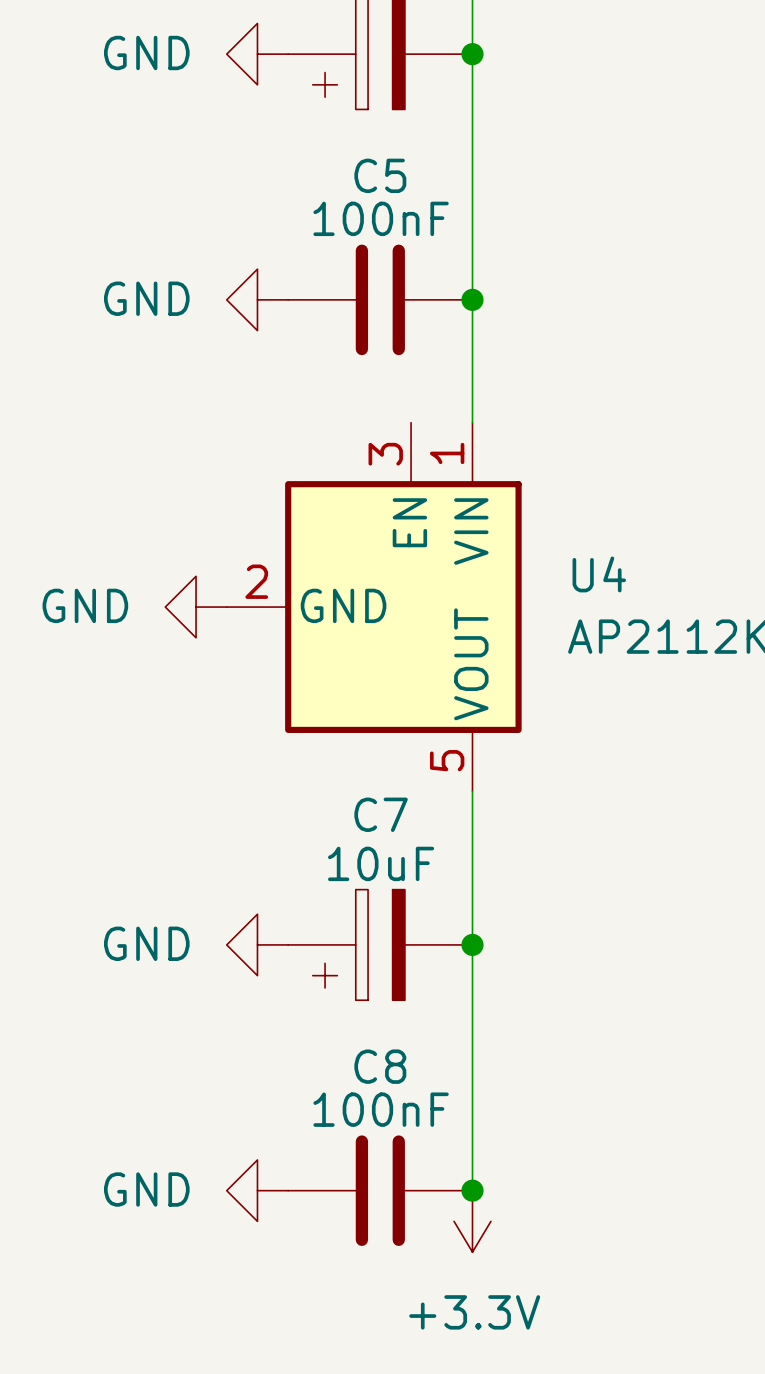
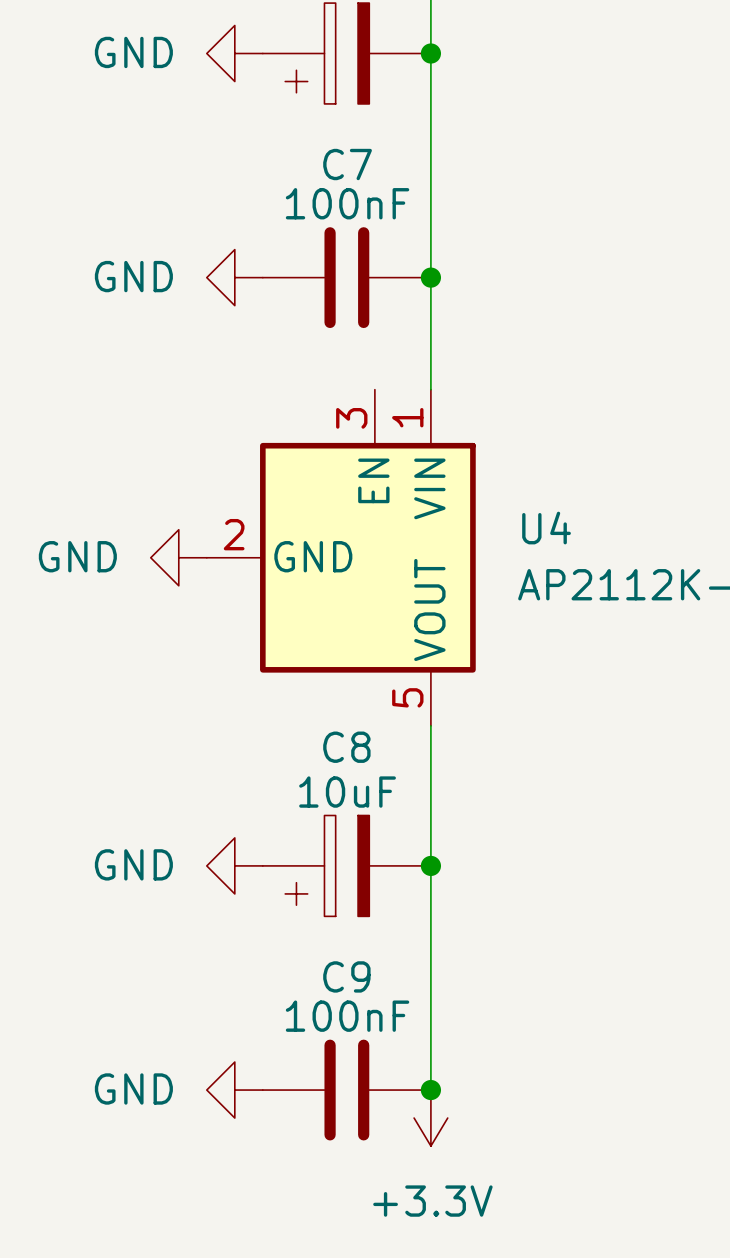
C5 name: C5 (380, 175) -> C7 (347, 164)
C7 name: C7 (381, 814) -> C8 (346, 747)
C8 name: C8 (380, 1066) -> C9 (346, 976)

